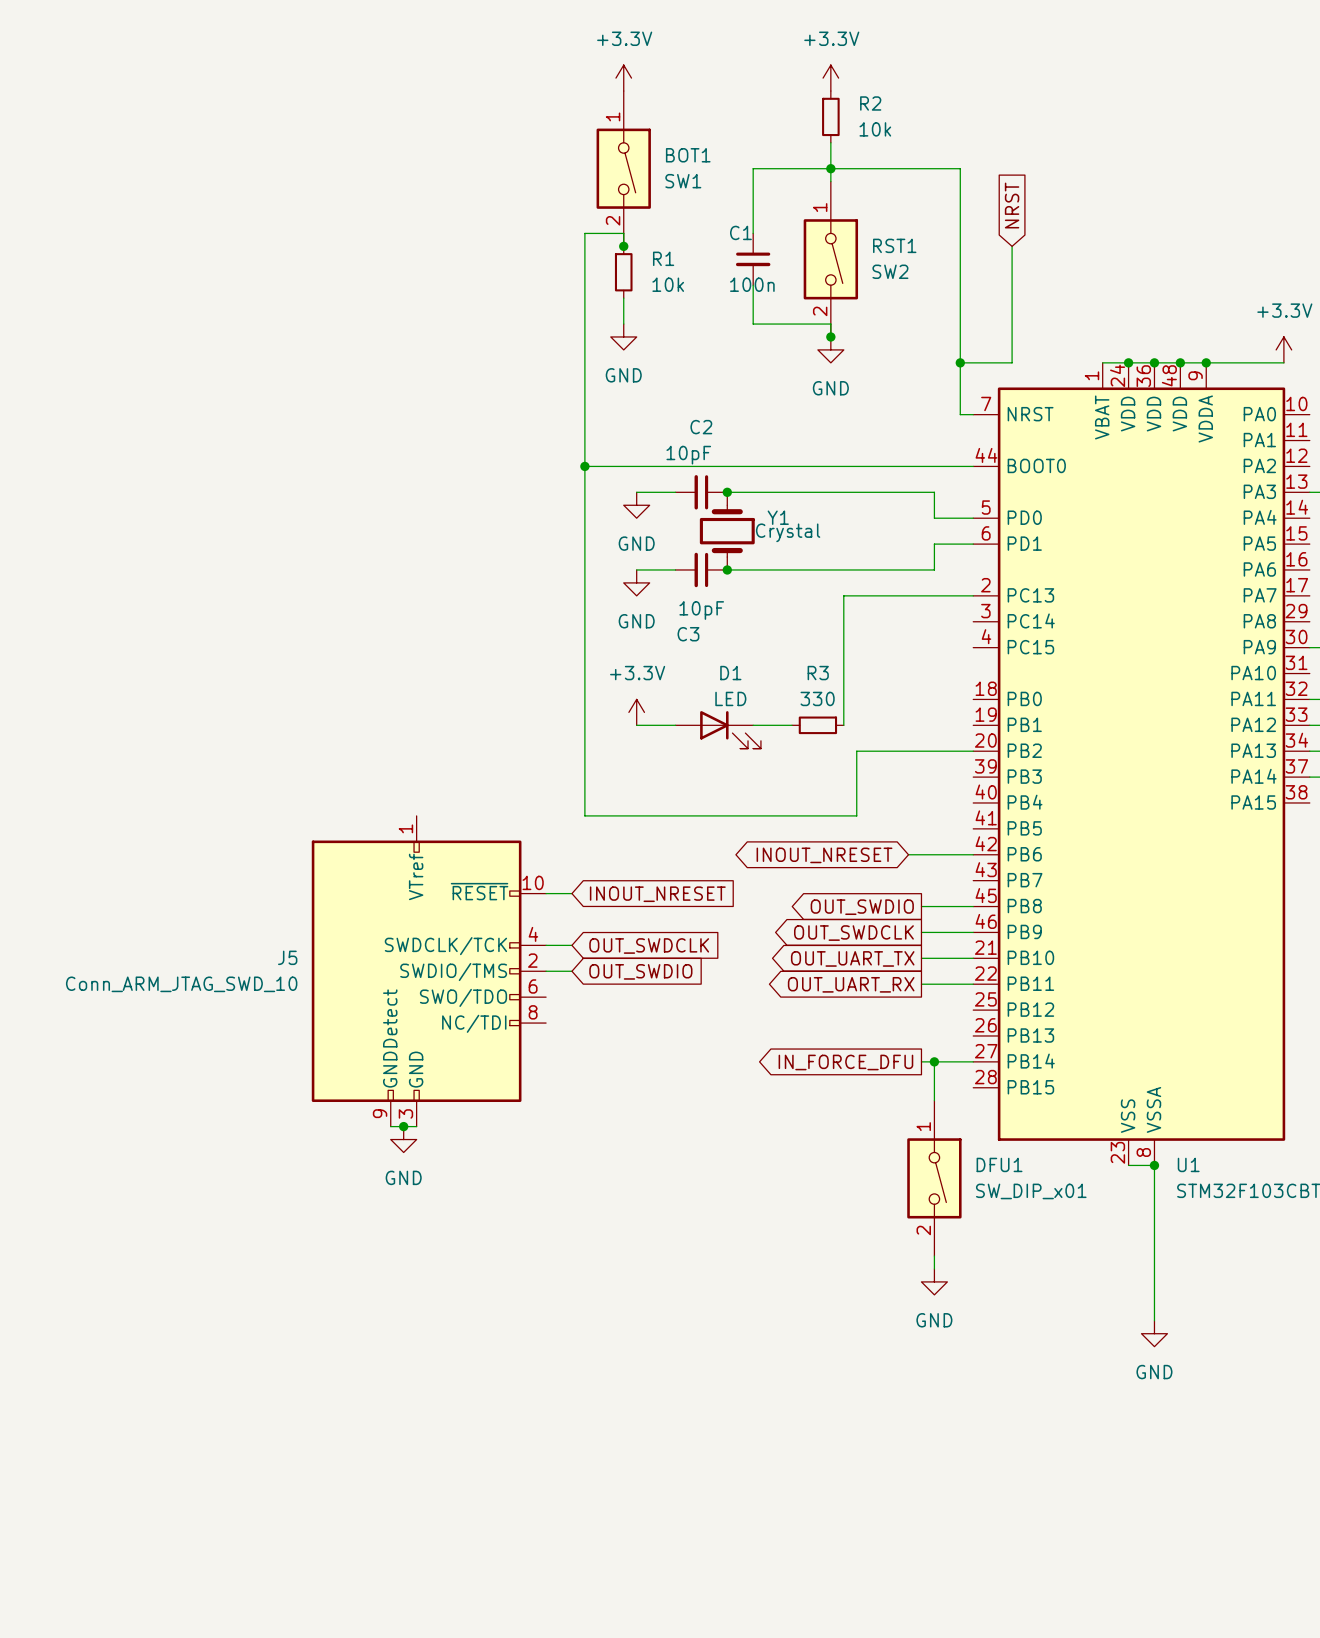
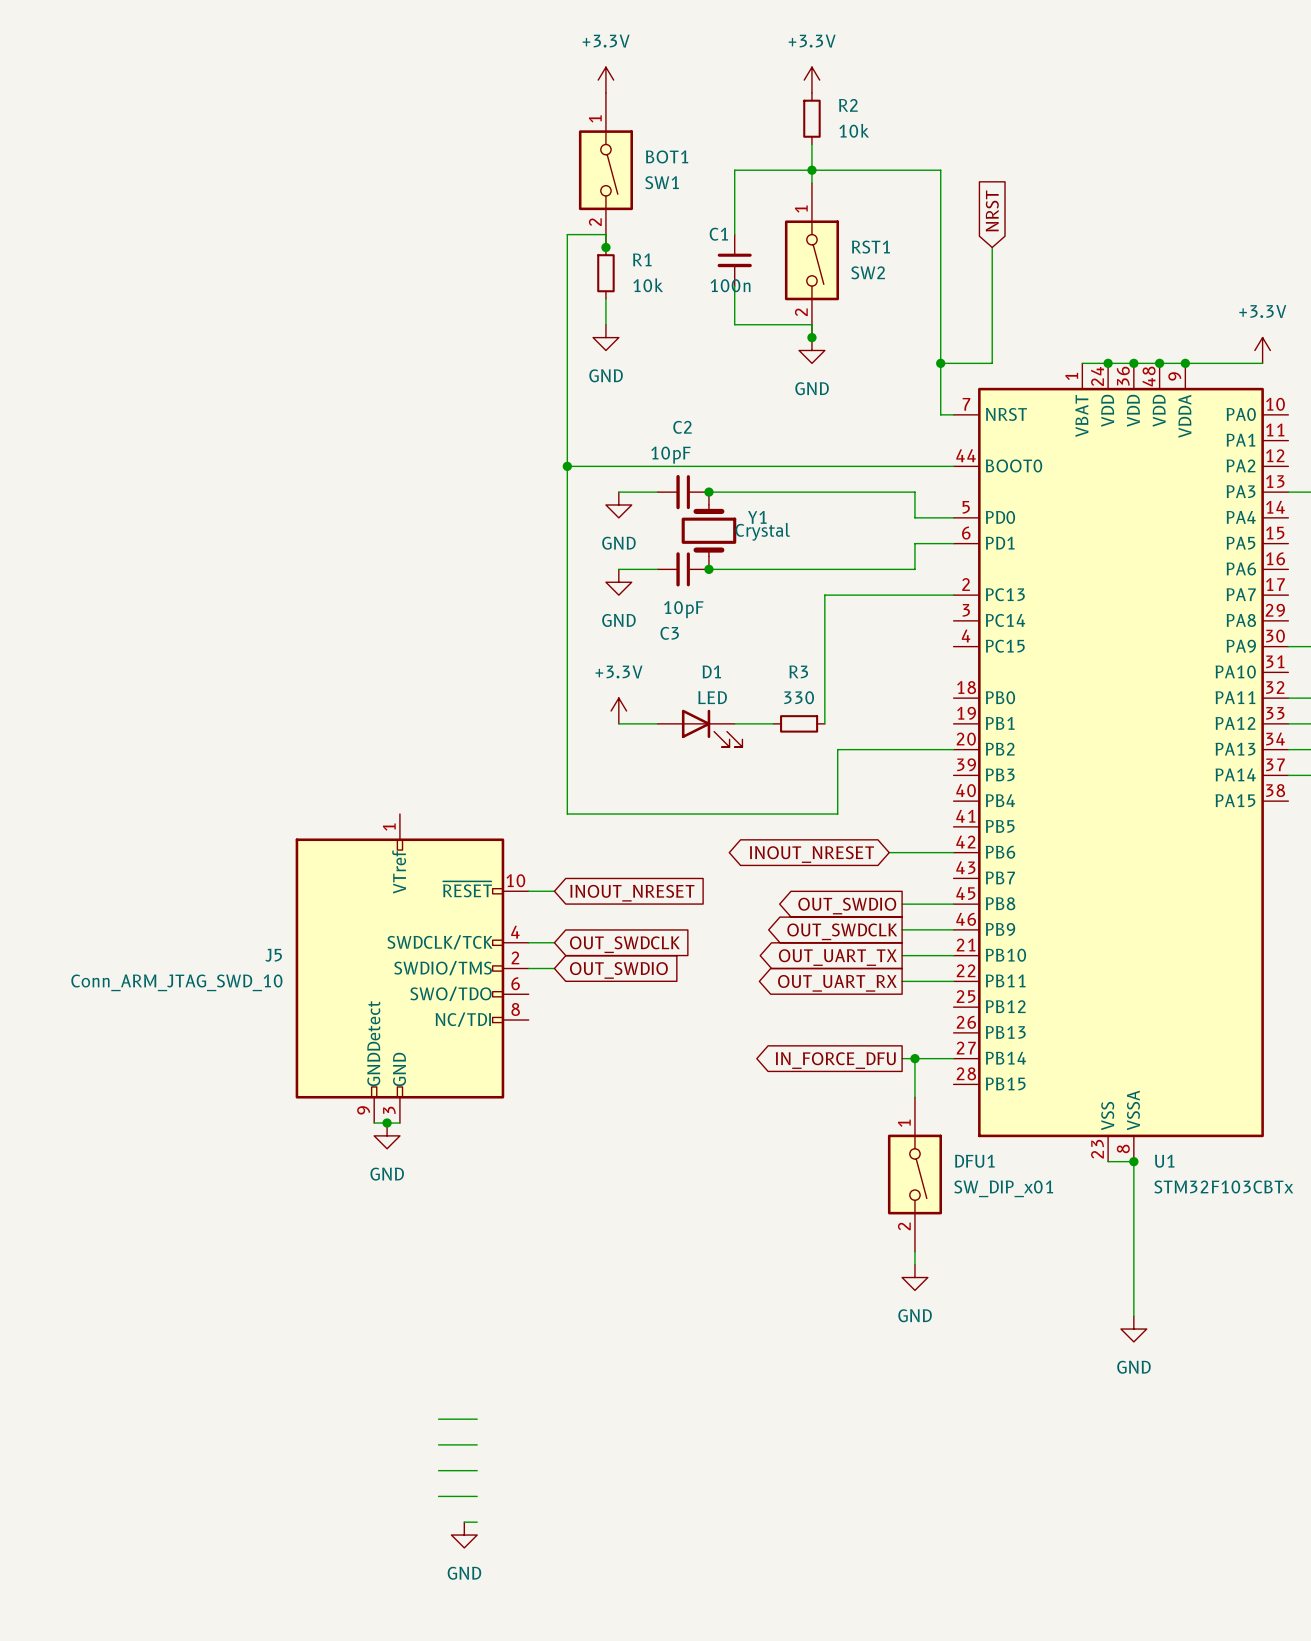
wire: none -> (438, 1419) (477, 1419)
wire: none -> (438, 1444) (477, 1444)
wire: none -> (438, 1470) (477, 1470)
wire: none -> (438, 1496) (477, 1496)
wire: none -> (464, 1522) (477, 1522)
power symbol: none -> GND (464, 1535)

